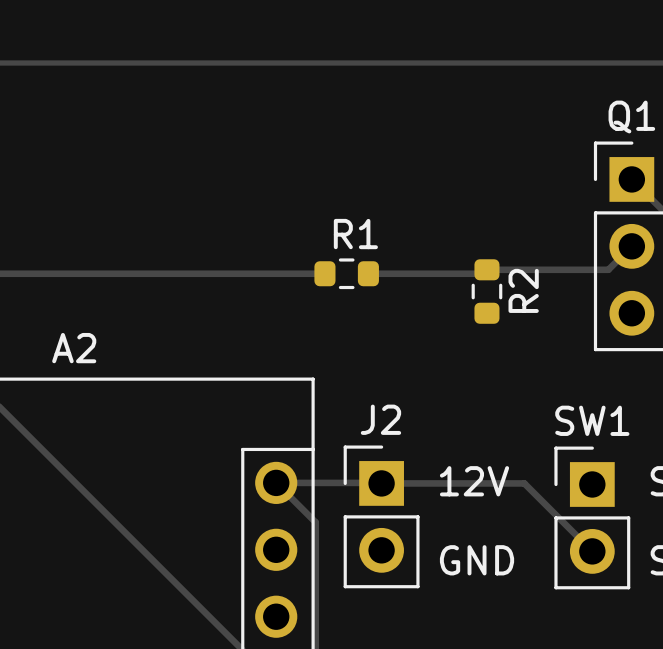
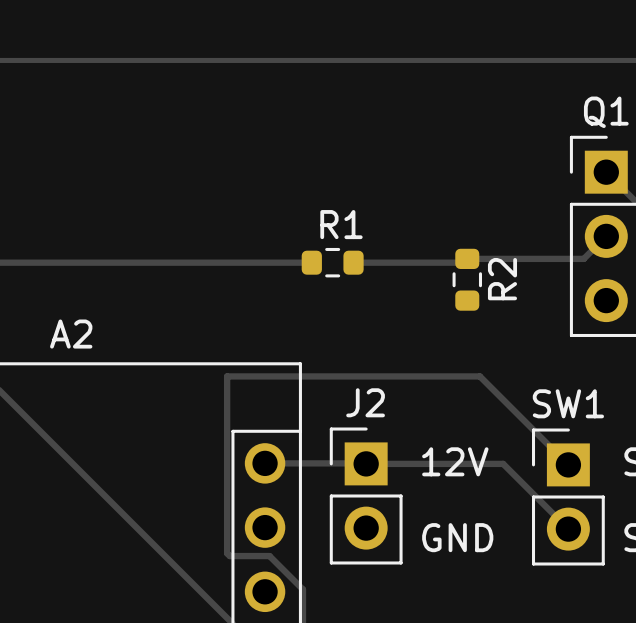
track: (276, 482) (315, 522) (315, 614) -> (567, 463) (479, 376) (227, 376) (227, 553) (229, 556) (269, 556) (302, 589)

